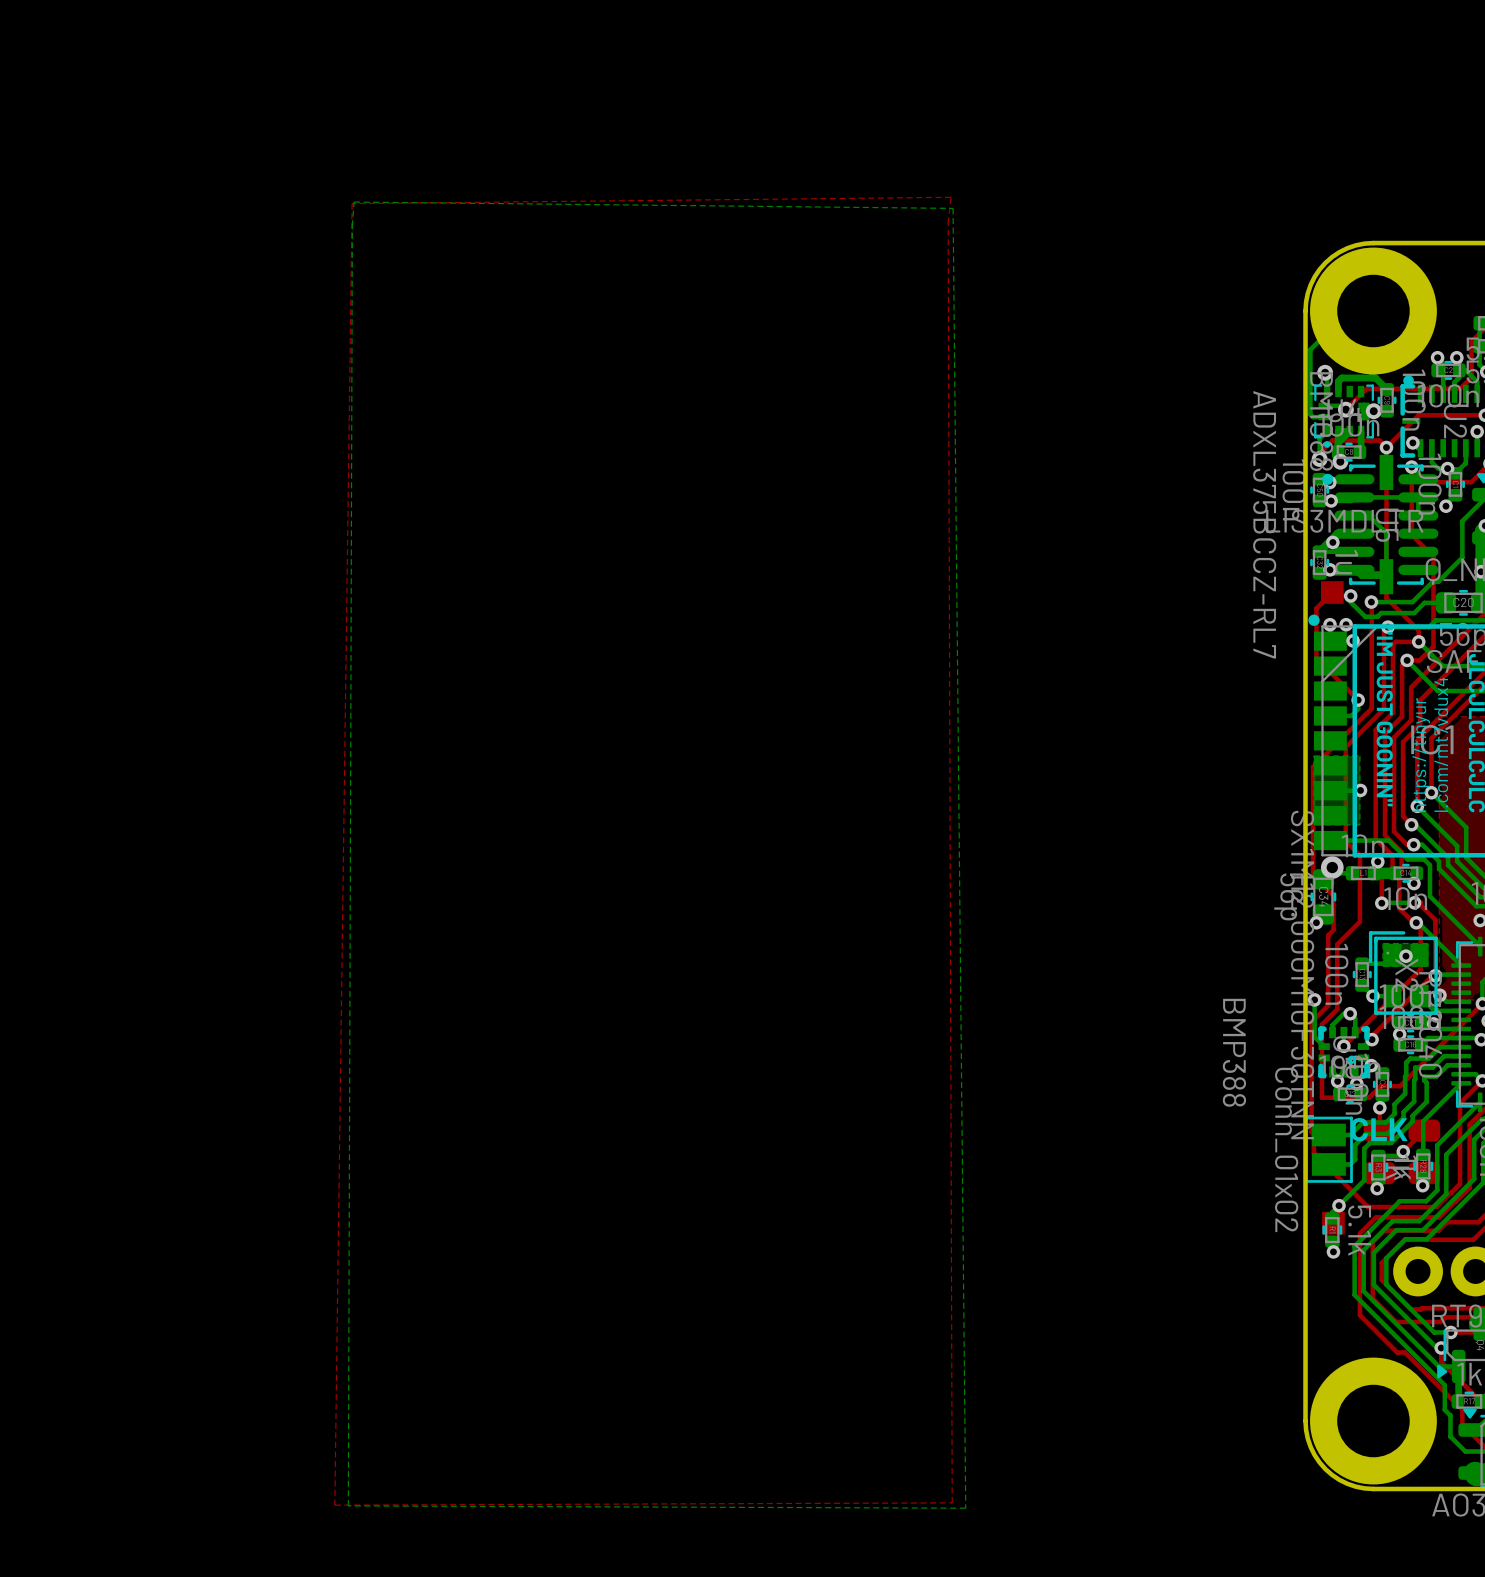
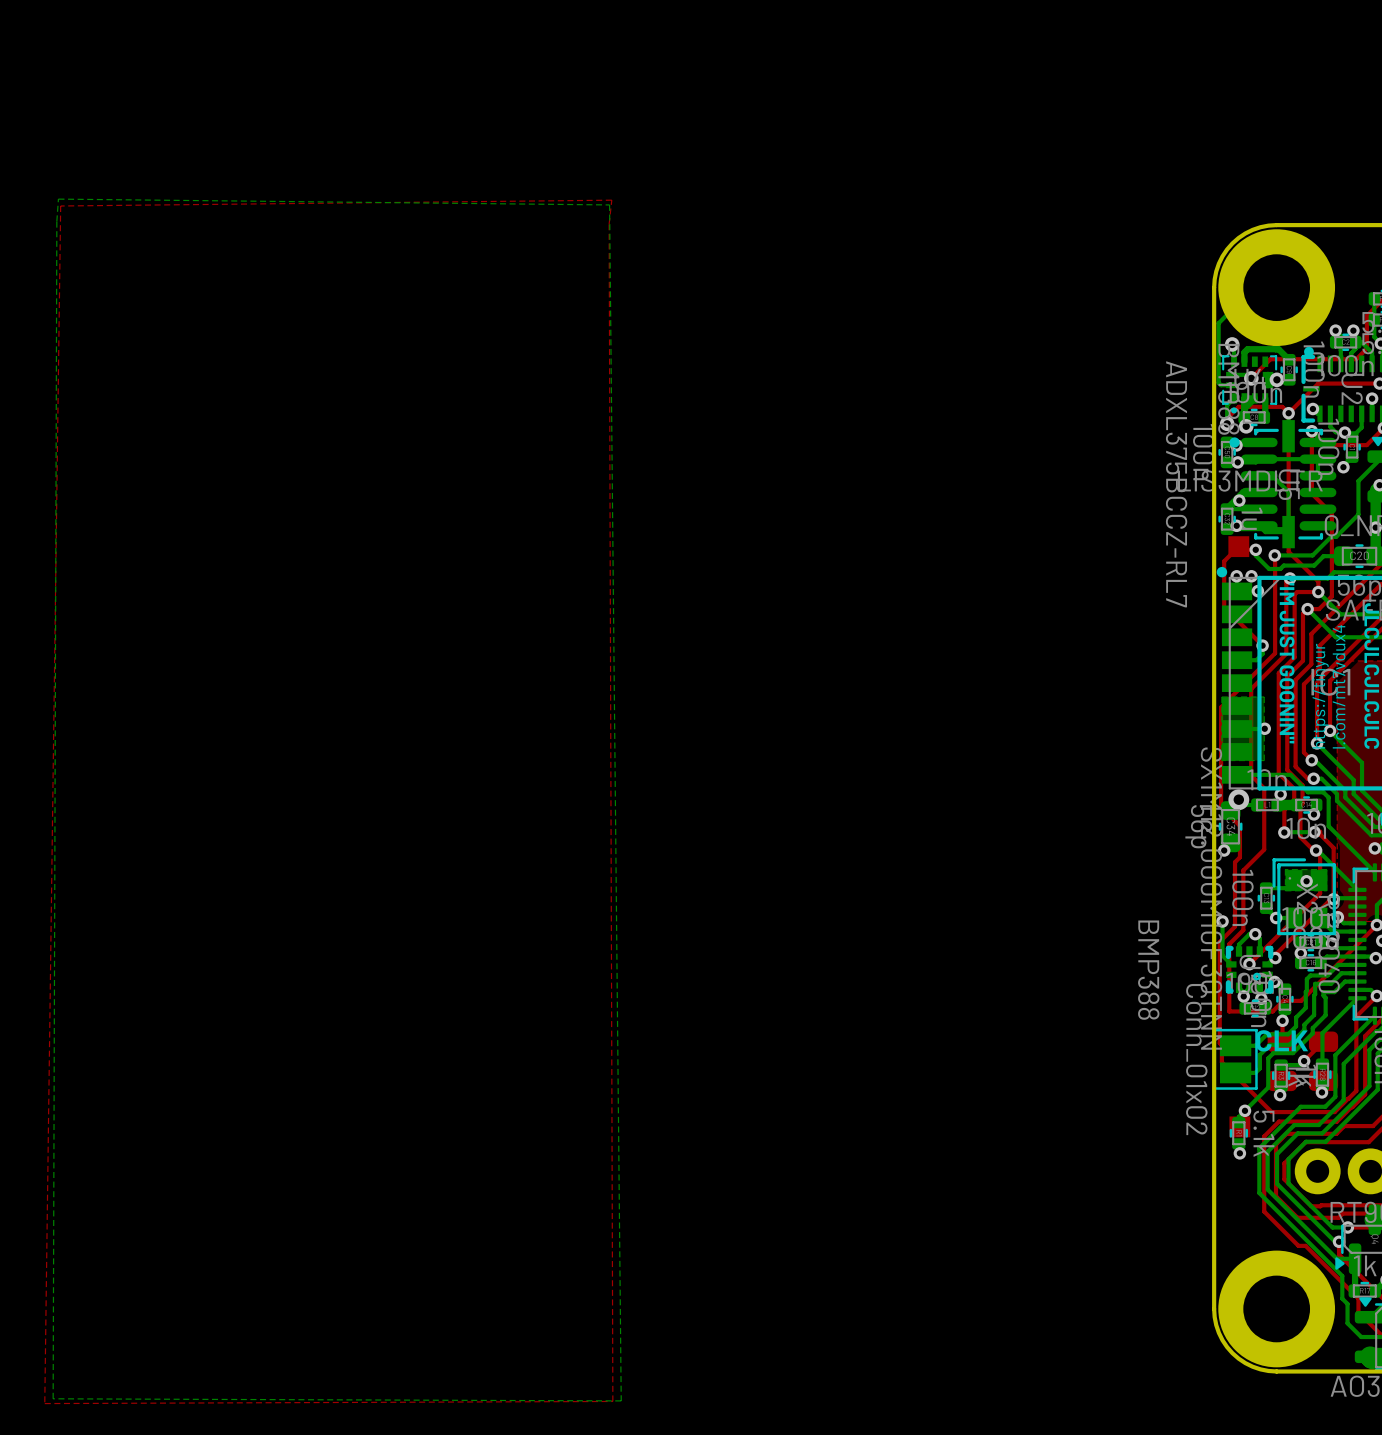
top zone outline: (951, 197) (352, 203) (334, 1505) (952, 1502) (948, 223) (951, 197) -> (611, 200) (60, 206) (44, 1403) (612, 1401) (609, 224) (611, 200)
bottom zone outline: (354, 202) (953, 208) (965, 1508) (348, 1505) (352, 226) (354, 202) -> (58, 199) (609, 204) (621, 1400) (53, 1398) (58, 199)

